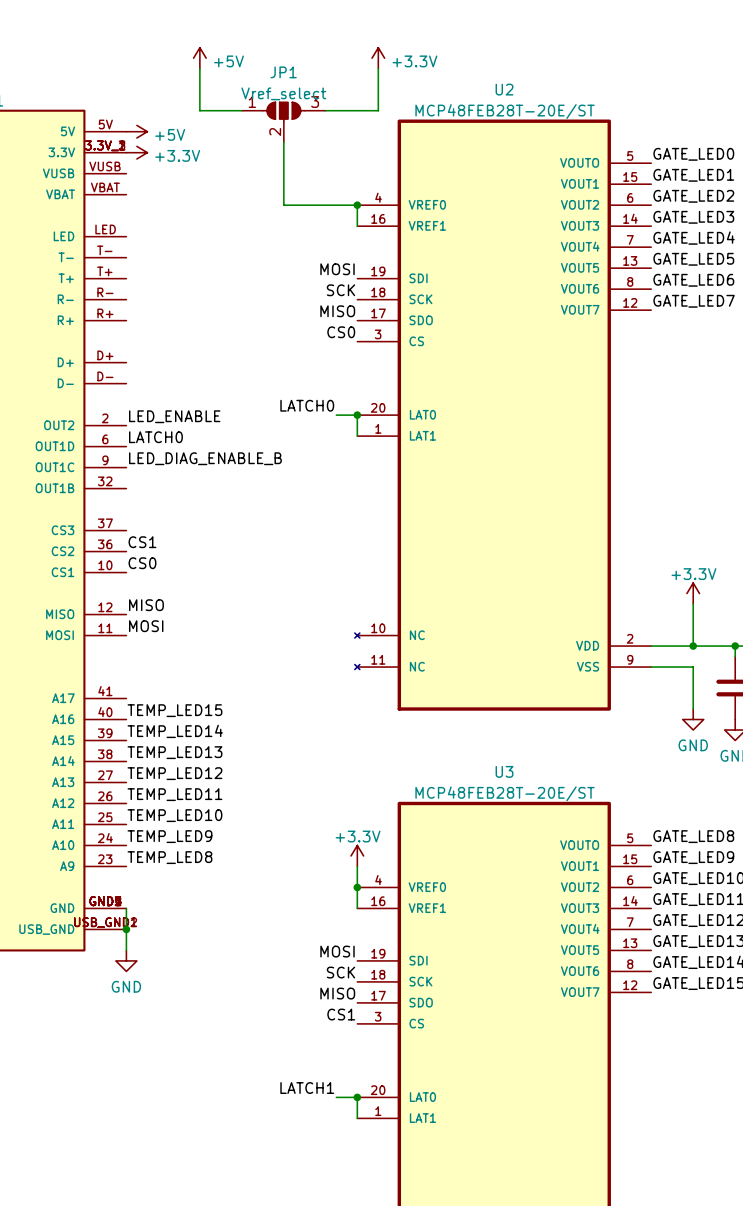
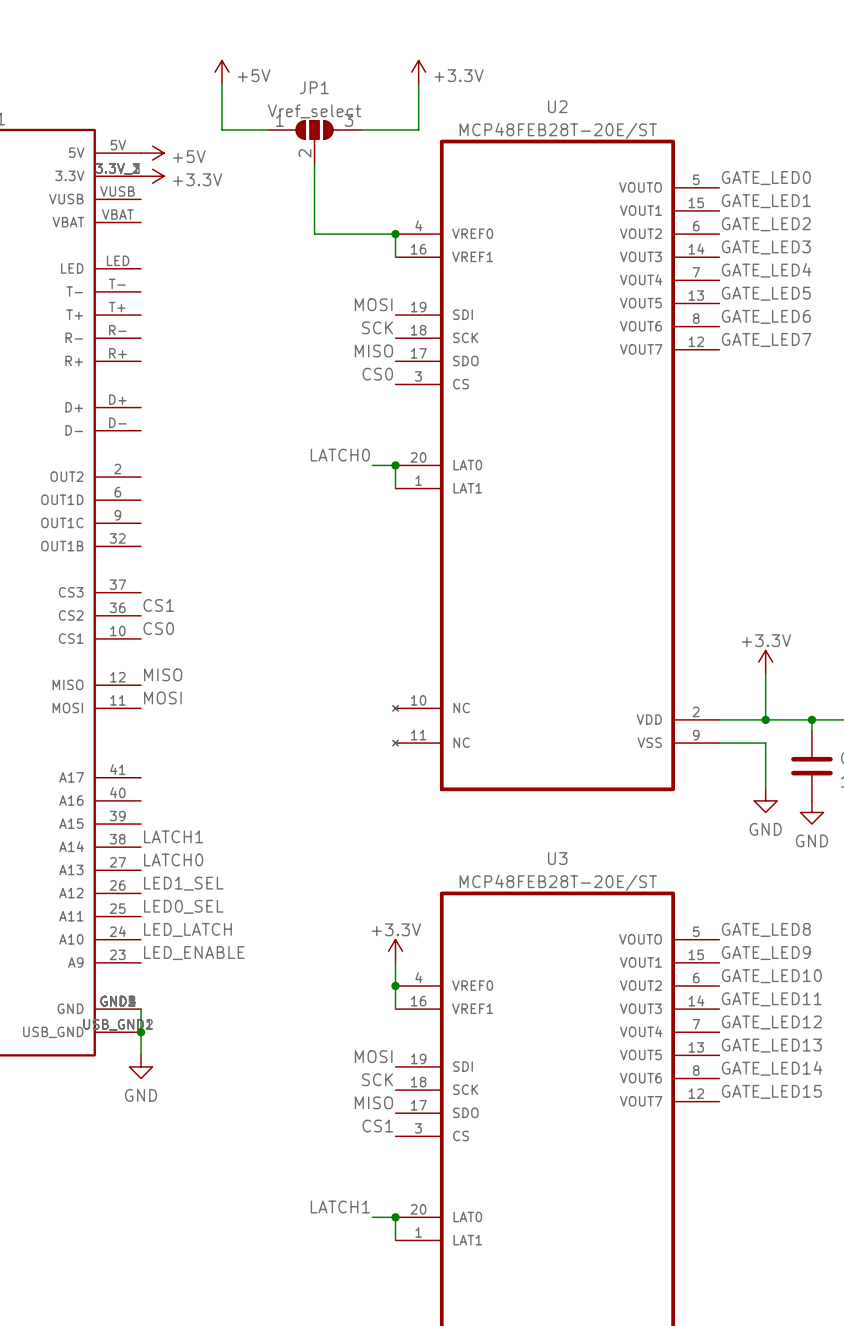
label: LED_ENABLE (174, 416) -> none
label: LATCH0 (155, 437) -> none
label: LED_DIAG_ENABLE_B (205, 458) -> none
label: TEMP_LED15 (174, 710) -> none
label: TEMP_LED14 (175, 731) -> none
label: TEMP_LED13 (174, 752) -> LATCH1 (173, 836)
label: TEMP_LED12 (174, 773) -> LATCH0 (173, 859)
label: TEMP_LED11 (174, 794) -> LED1_SEL (183, 883)
label: TEMP_LED10 (174, 815) -> LED0_SEL (183, 906)
label: TEMP_LED9 (169, 836) -> LED_LATCH (187, 929)
label: TEMP_LED8 (169, 857) -> LED_ENABLE (194, 953)

